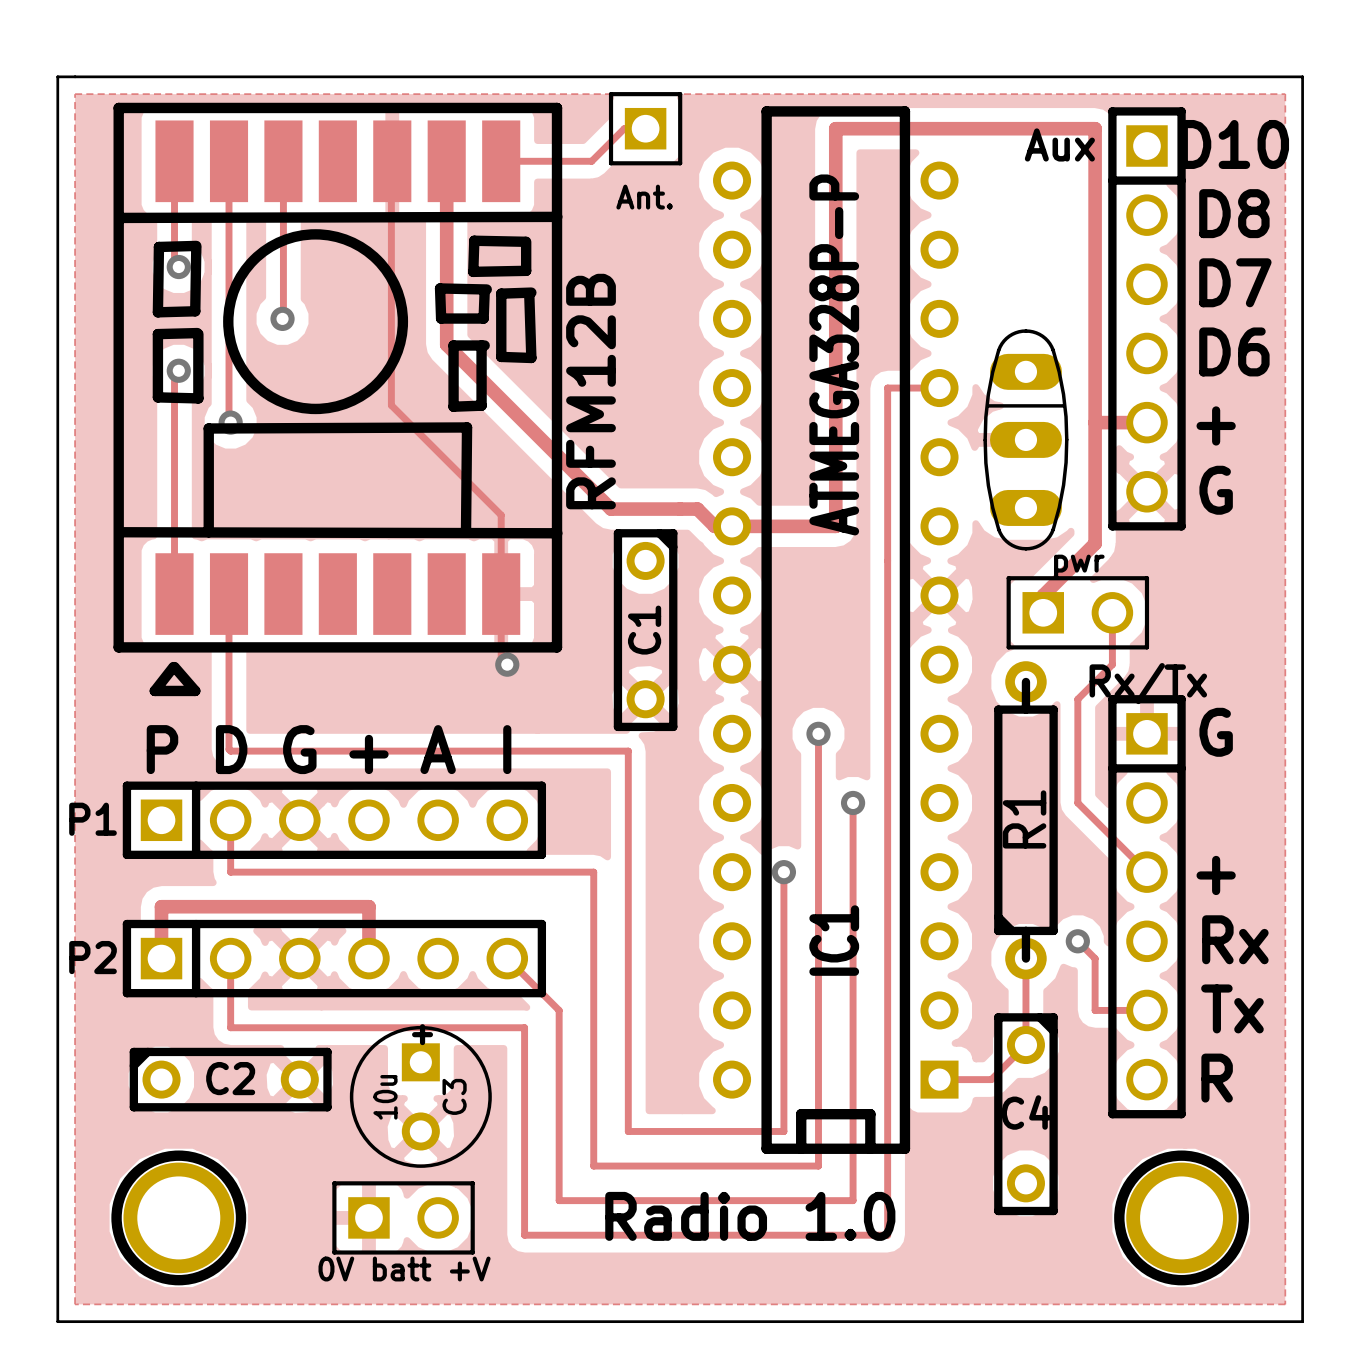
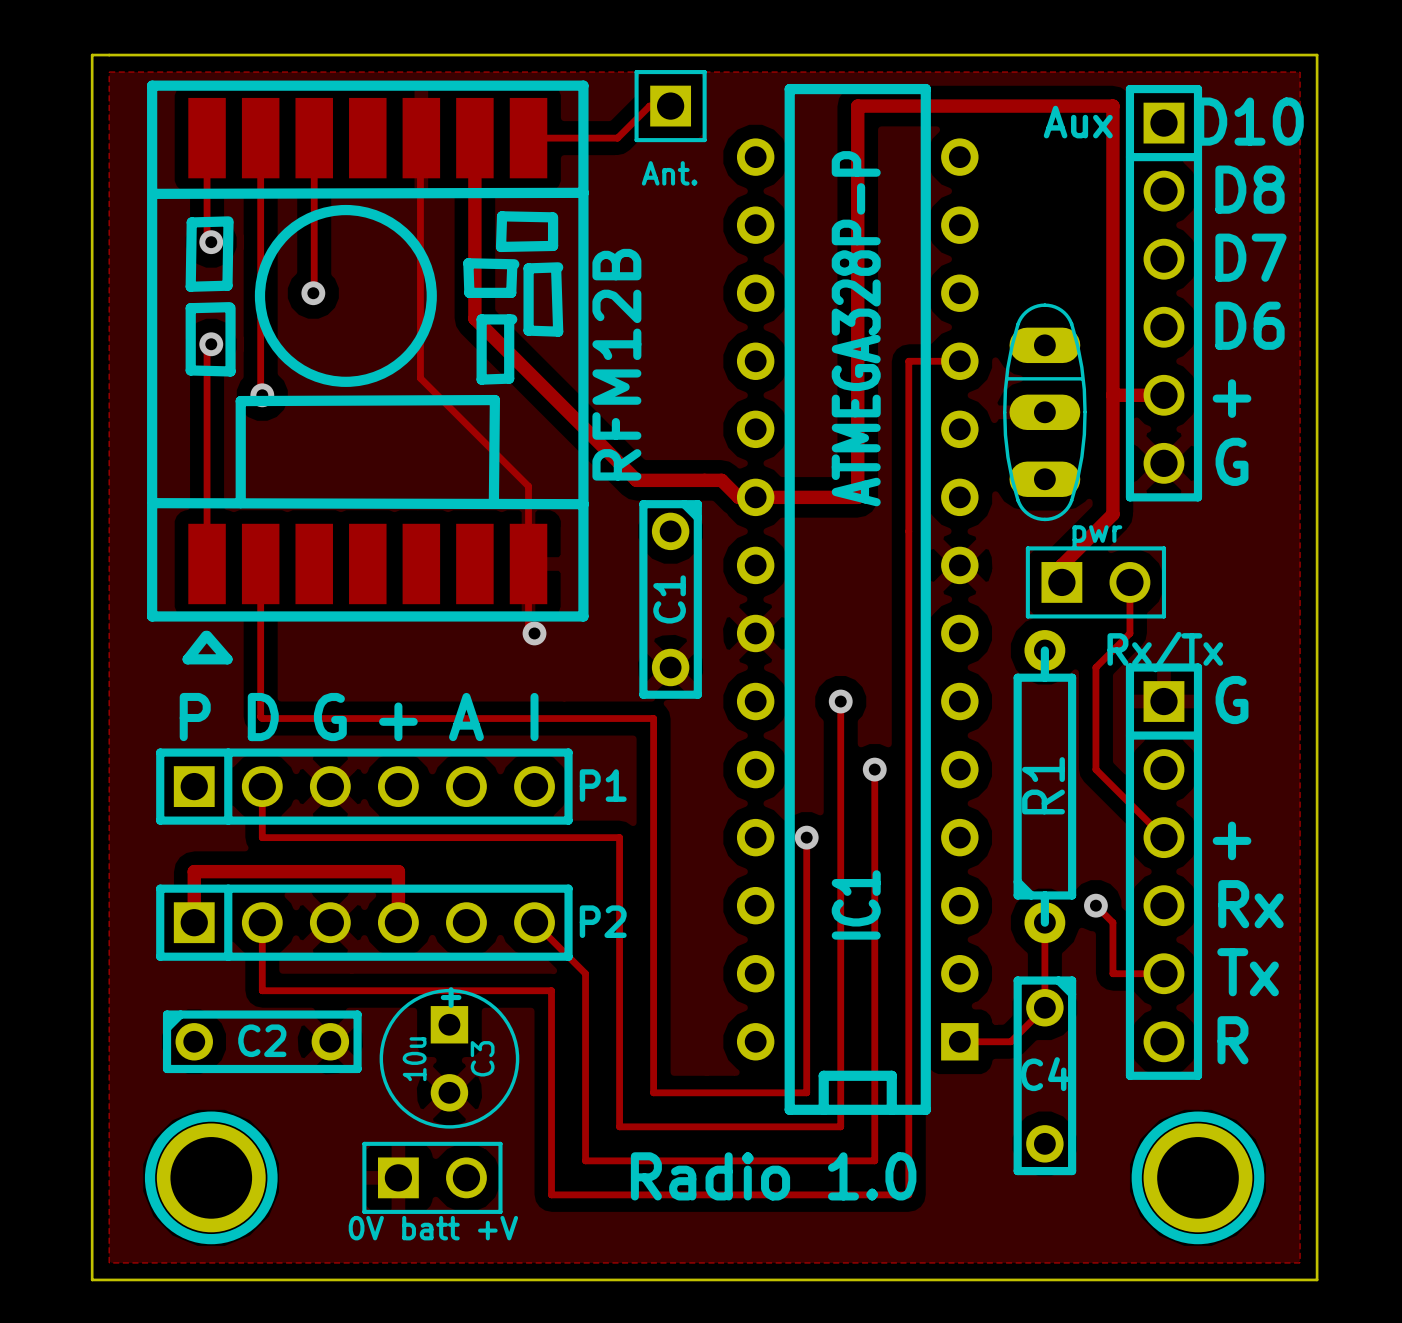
P1 name position: P1 (93, 819) -> P1 (603, 785)
P2 name position: P2 (93, 957) -> P2 (603, 921)

